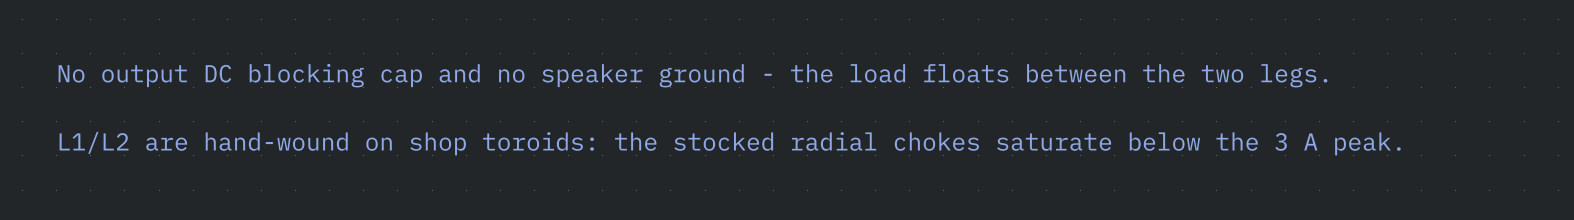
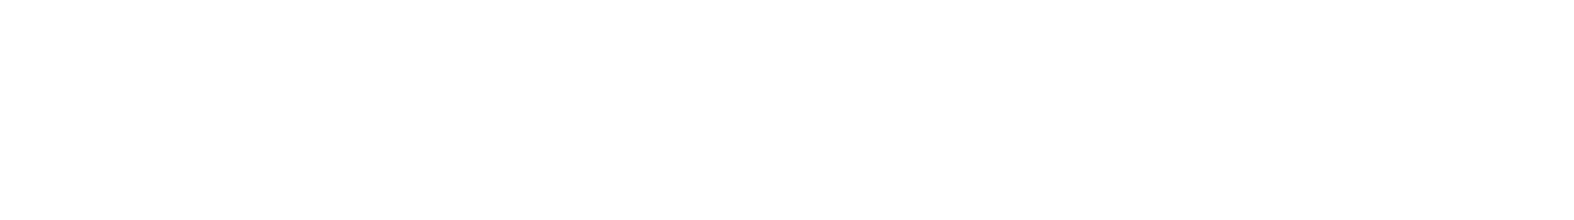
text: No output DC blocking cap and no speaker ground - the load floats between the two legs. (692, 75) -> none
text: L1/L2 are hand-wound on shop toroids: the stocked radial chokes saturate below the 3 A peak. (730, 143) -> none

